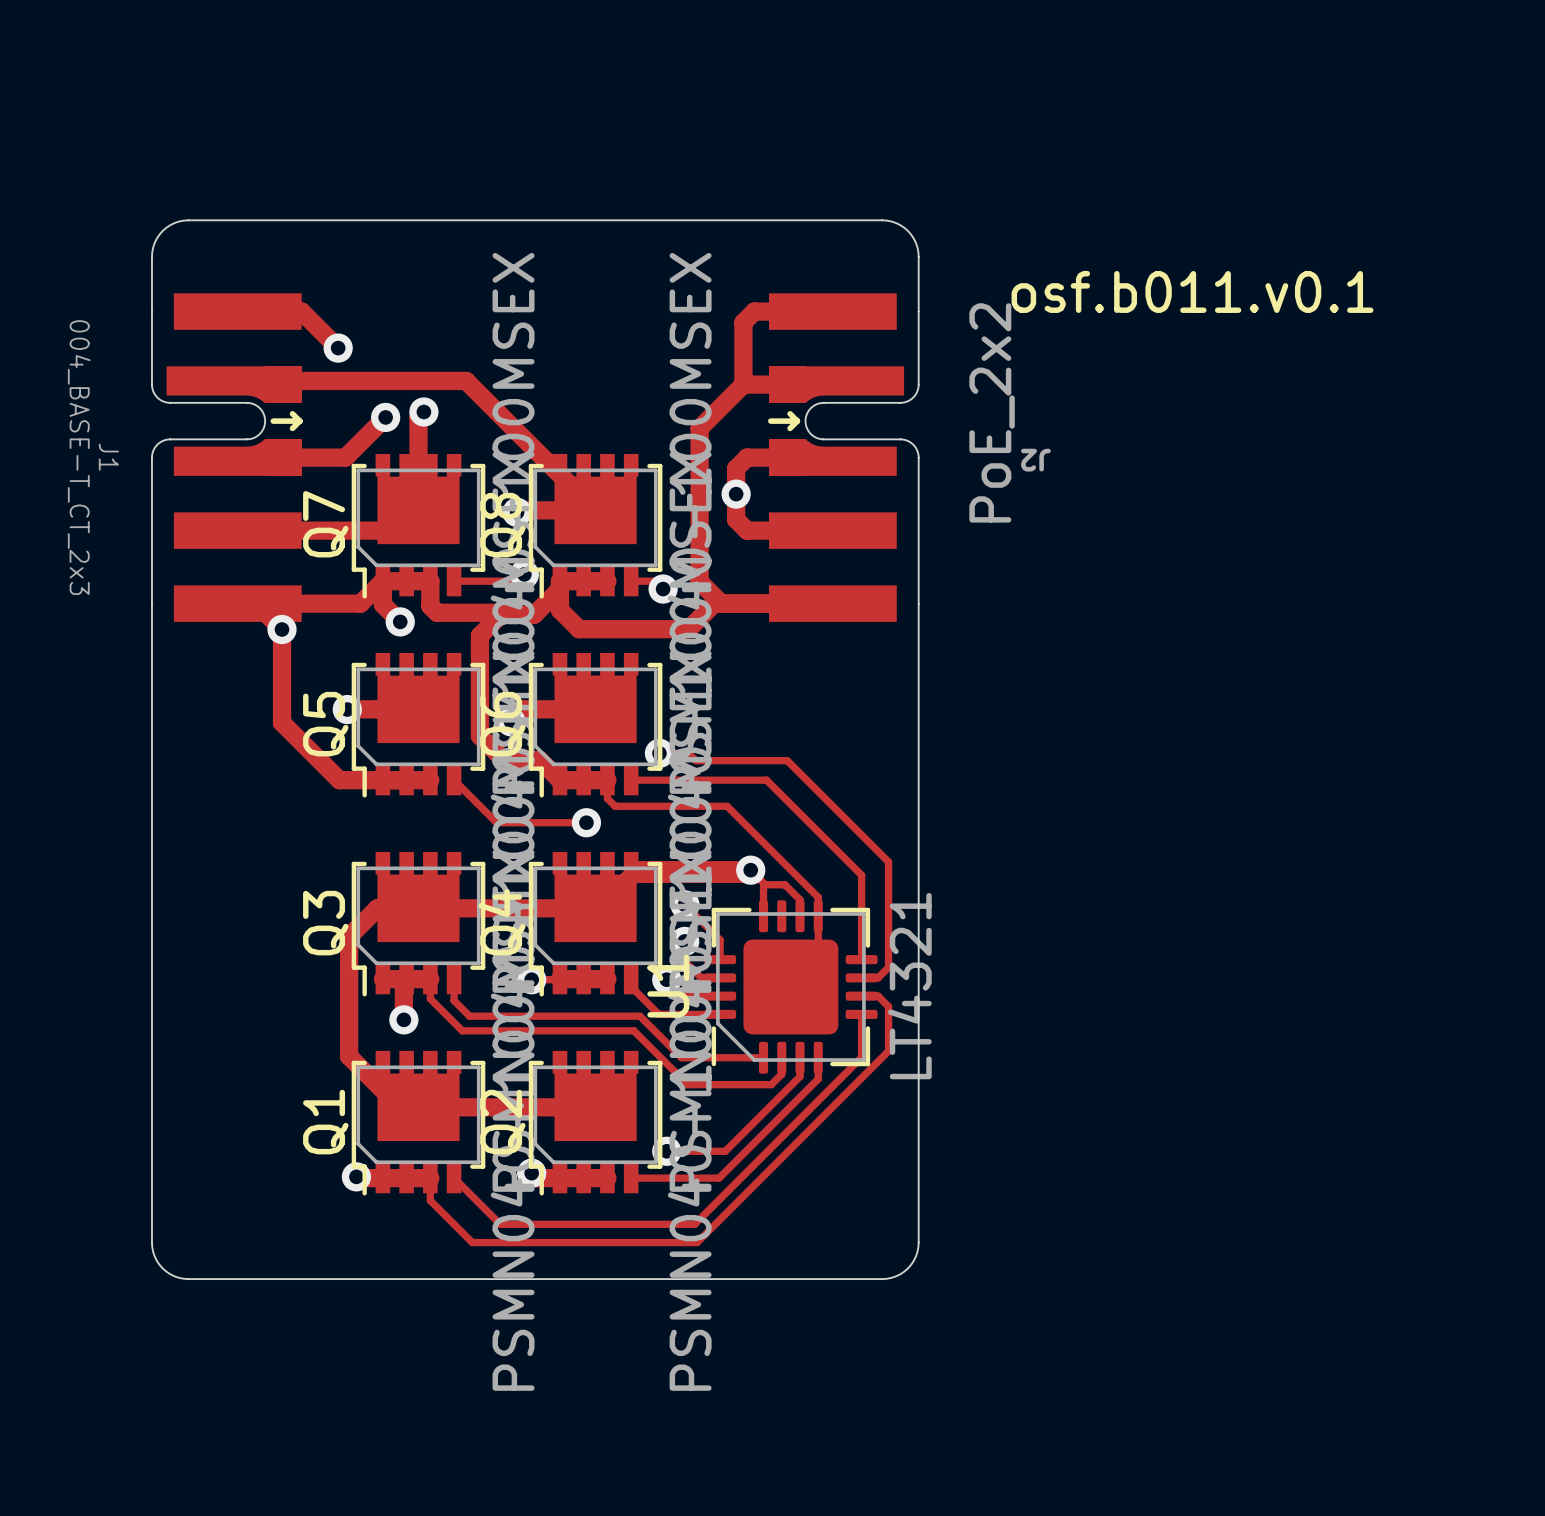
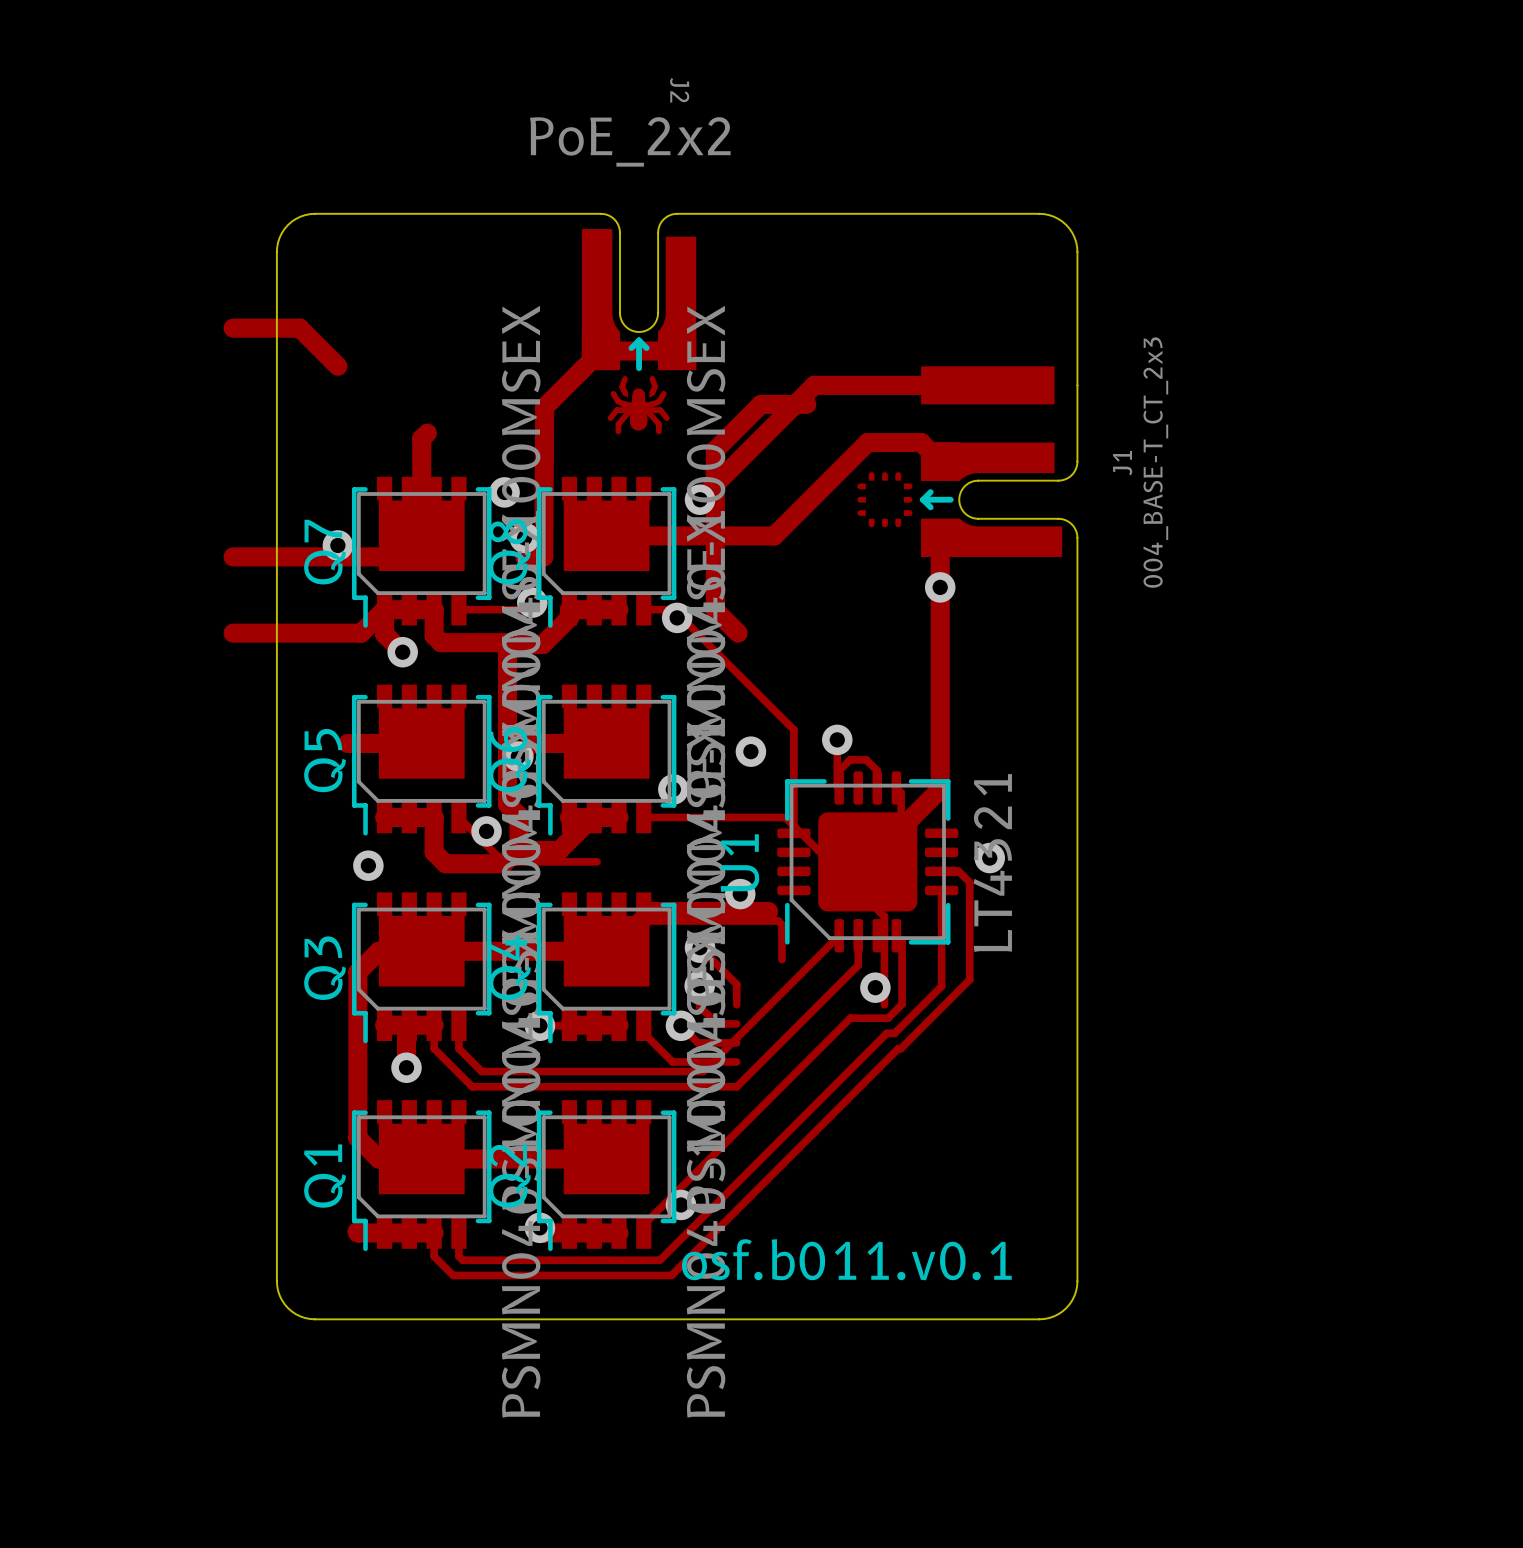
board edge: none -> (600, 213) (310, 214) (300, 216) (288, 224) (278, 242) (276, 1281) (279, 1295) (291, 1311) (300, 1316) (315, 1319) (1039, 1319) (1053, 1316) (1066, 1308) (1074, 1295) (1077, 1281) (1077, 537)
board edge: none -> (677, 213) (1039, 213) (1053, 216) (1069, 228) (1077, 246) (1077, 385)
text: osf.b011.v0.1 (1192, 291) -> none
J1 footprint: [151, 293, 303, 622] -> [857, 366, 1079, 557]
J2 footprint: [768, 293, 920, 622] -> [581, 212, 697, 435]
board edge: (151, 311) (151, 256) (154, 242) (166, 227) (174, 223) (188, 220) (886, 220) (904, 227) (915, 242) (918, 256) (918, 311) -> none
track: (832, 311) (754, 311) (743, 322) (743, 384) -> none
track: none -> (677, 351) (600, 351) (544, 407) (543, 556) (524, 556)
via: (338, 348) -> none
track: none -> (987, 385) (814, 385) (700, 499)
track: (283, 384) (287, 380) (466, 380) (595, 510) (519, 510) (517, 512) -> none
via: (423, 411) -> none
J2 value position: PoE_2x2 (992, 412) -> PoE_2x2 (630, 141)
track: (385, 417) (345, 457) (283, 457) -> none
via: (385, 417) -> none
track: none -> (940, 461) (921, 442) (867, 442) (774, 535) (649, 535)
J1 value position: 004_BASE-T_CT_2x3 (79, 457) -> 004_BASE-T_CT_2x3 (1155, 462)
J1 name position: J1 (108, 457) -> J1 (1122, 463)
track: (787, 457) (747, 457) (736, 468) (736, 519) (747, 530) (832, 530) -> none
J2 name position: J2 (1035, 460) -> J2 (679, 90)
via: none -> (504, 492)
via position: (736, 494) -> (700, 499)
track: none -> (940, 537) (940, 789) (867, 861) (901, 828) (901, 792) (896, 788)
via: none -> (337, 545)
via: none -> (940, 587)
track: none -> (674, 610) (793, 729) (793, 833)
track: (559, 589) (559, 610) (579, 629) (688, 629) (714, 603) (832, 603) -> none
board edge: (151, 603) (151, 1242) (154, 1256) (162, 1268) (174, 1276) (188, 1279) (882, 1279) (896, 1276) (907, 1268) (915, 1256) (918, 1242) (918, 603) -> none
track: (256, 603) (281, 629) (281, 722) (339, 780) (382, 780) -> none
track: (500, 614) (479, 635) (479, 736) (504, 760) (539, 760) (559, 780) -> (507, 644) (507, 804) (518, 815) (518, 848) (503, 863) (445, 863) (434, 852) (434, 817)
via: (281, 629) -> none
track: none -> (837, 739) (837, 786) (839, 788) (839, 770) (850, 759) (866, 759) (877, 770) (877, 788)
via: none -> (837, 739)
via: (347, 709) -> none
via: none -> (750, 751)
track: (659, 753) (688, 753) (695, 760) (787, 760) (888, 861) (888, 967) (878, 977) (861, 977) -> none
track: none -> (592, 817) (559, 850) (517, 850)
track: (607, 780) (607, 798) (615, 806) (727, 806) (818, 897) (818, 959) (790, 987) -> none
via: none -> (486, 831)
via: none -> (989, 858)
via: (586, 822) -> none
via: none -> (368, 865)
via position: (750, 870) -> (740, 894)
track: (765, 884) (784, 884) (800, 899) (800, 916) -> none
track: (357, 928) (349, 936) (349, 1056) (400, 1107) -> (357, 972) (357, 1138) (378, 1159) (402, 1159)
via: none -> (875, 987)
U1 position: (790, 987) -> (867, 861)
track: (861, 996) (878, 996) (888, 1006) (888, 1051) (697, 1242) (472, 1242) (448, 1218) -> (941, 871) (958, 871) (969, 882) (969, 979) (671, 1275) (453, 1275)
track: (430, 998) (462, 1030) (633, 1030) (687, 1084) (771, 1084) (781, 1074) (781, 1057) -> (434, 1045) (434, 1048) (472, 1086) (736, 1086) (858, 965) (858, 935)
track: (454, 1000) (469, 1016) (639, 1016) (681, 1057) (763, 1057) -> (458, 1047) (481, 1071) (703, 1071) (839, 935)
track: (861, 1014) (861, 1057) (694, 1224) (500, 1224) (454, 1178) -> (941, 890) (941, 986) (894, 1033) (886, 1033) (660, 1260) (462, 1260) (458, 1256) (458, 1232)
track: (800, 1057) (800, 1076) (725, 1151) (666, 1151) -> none
track: (818, 1057) (818, 1078) (719, 1178) (631, 1178) -> (896, 935) (902, 941) (902, 1004) (888, 1018) (850, 1018) (643, 1224) (643, 1232)
via: (356, 1176) -> none
text: none -> osf.b011.v0.1 (846, 1259)

